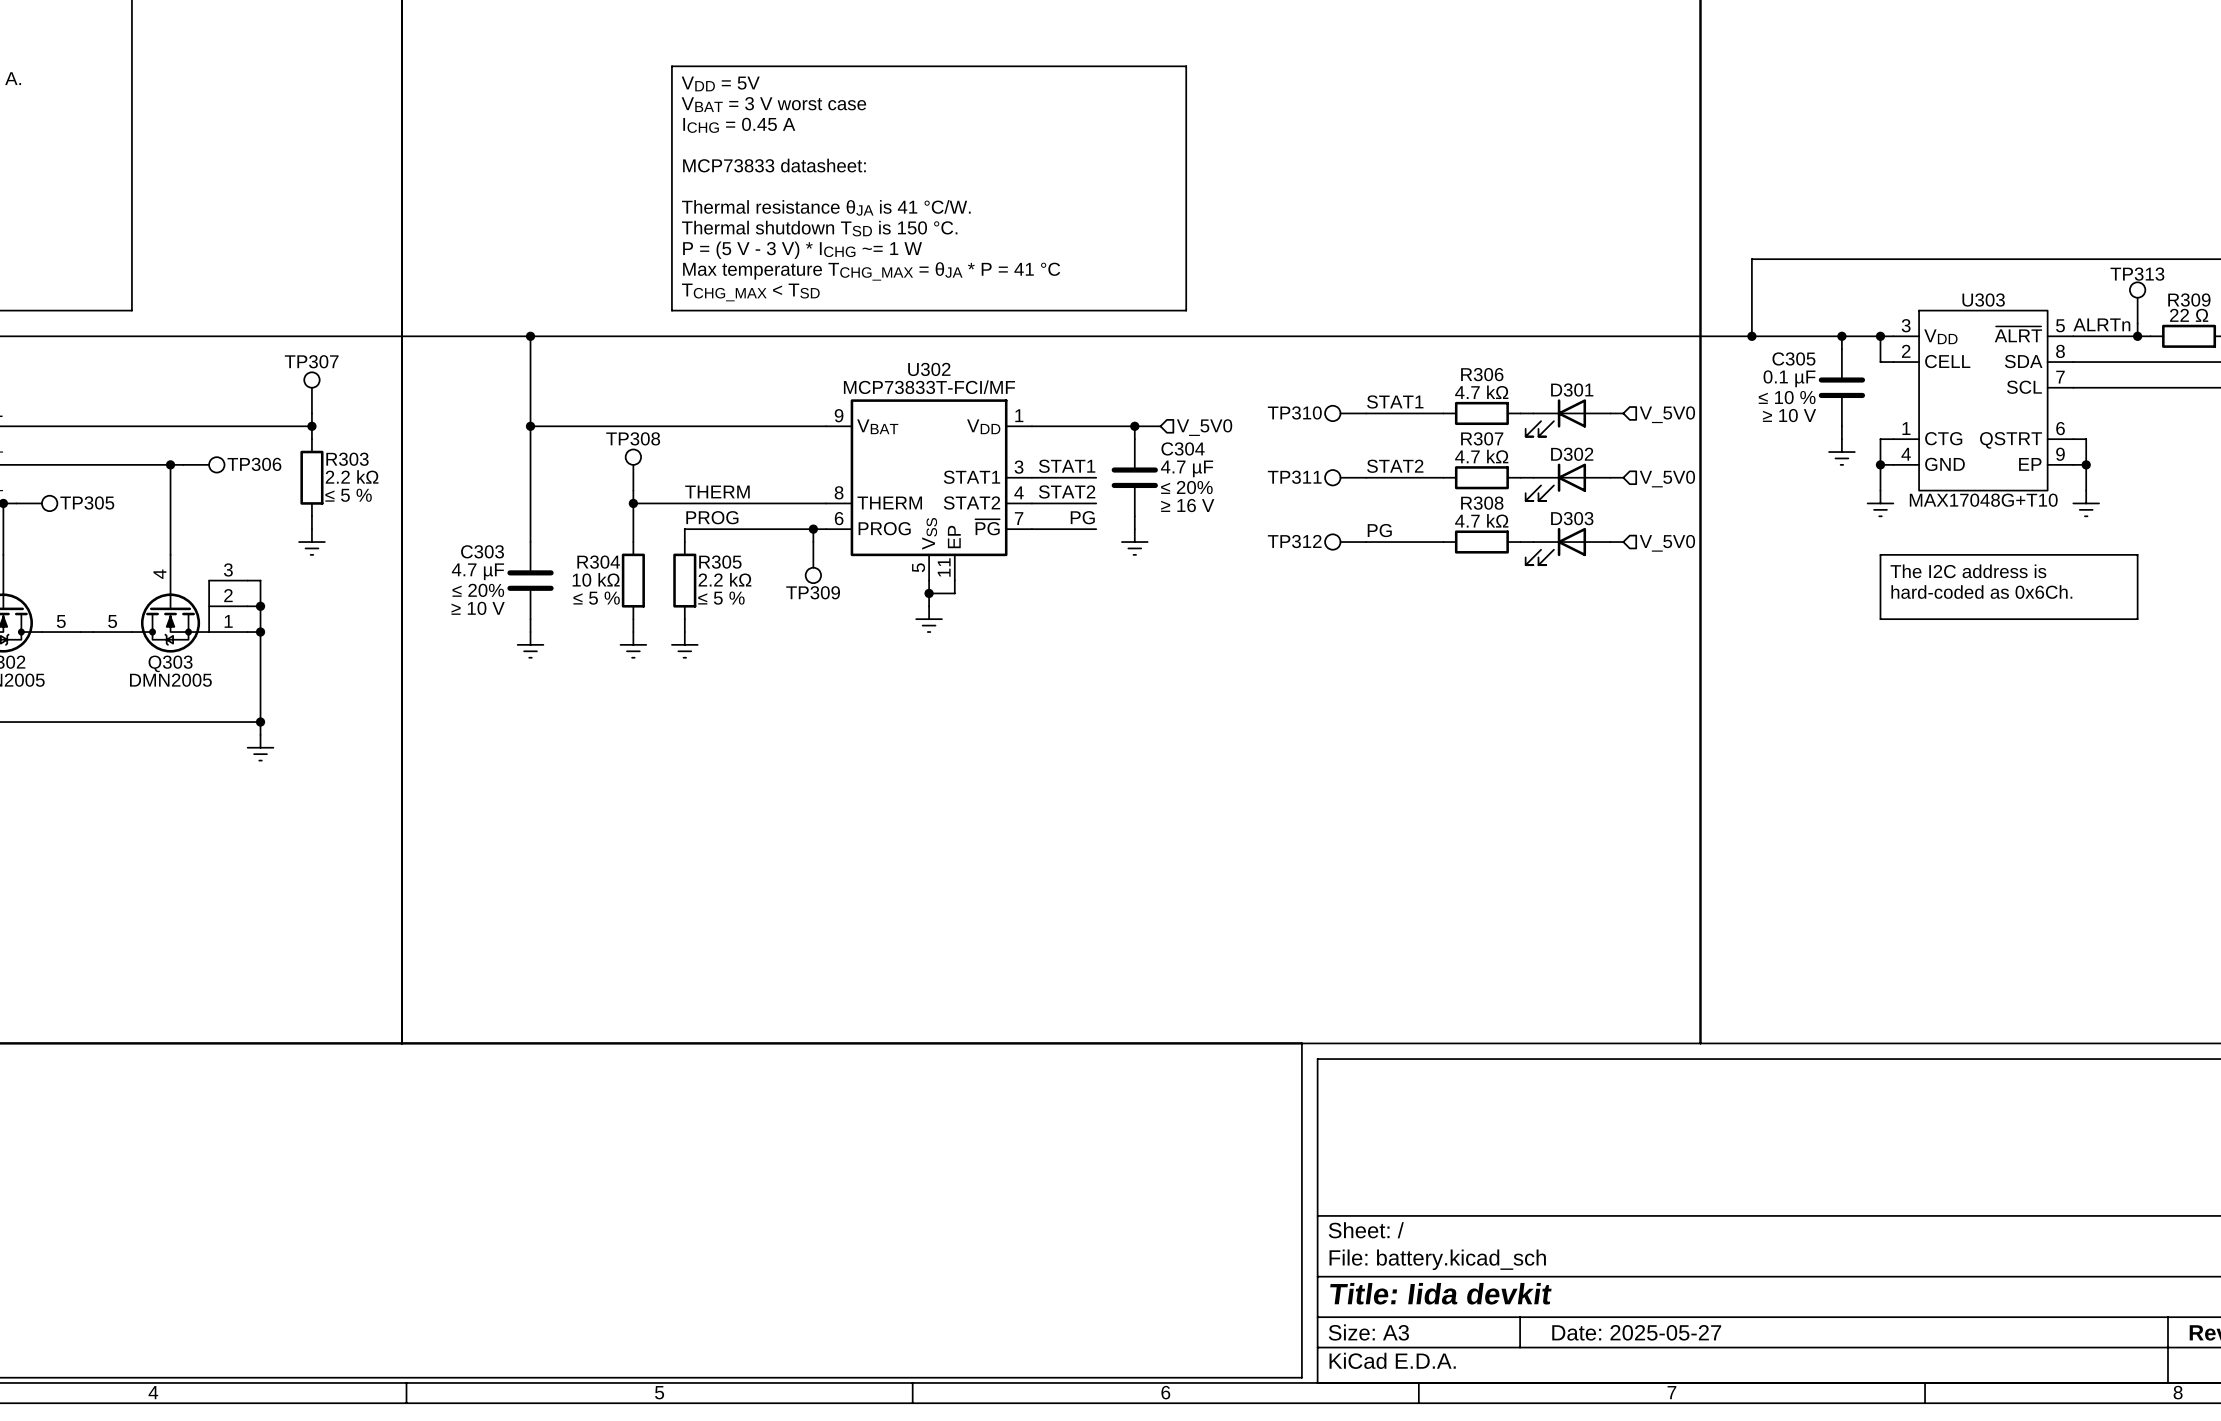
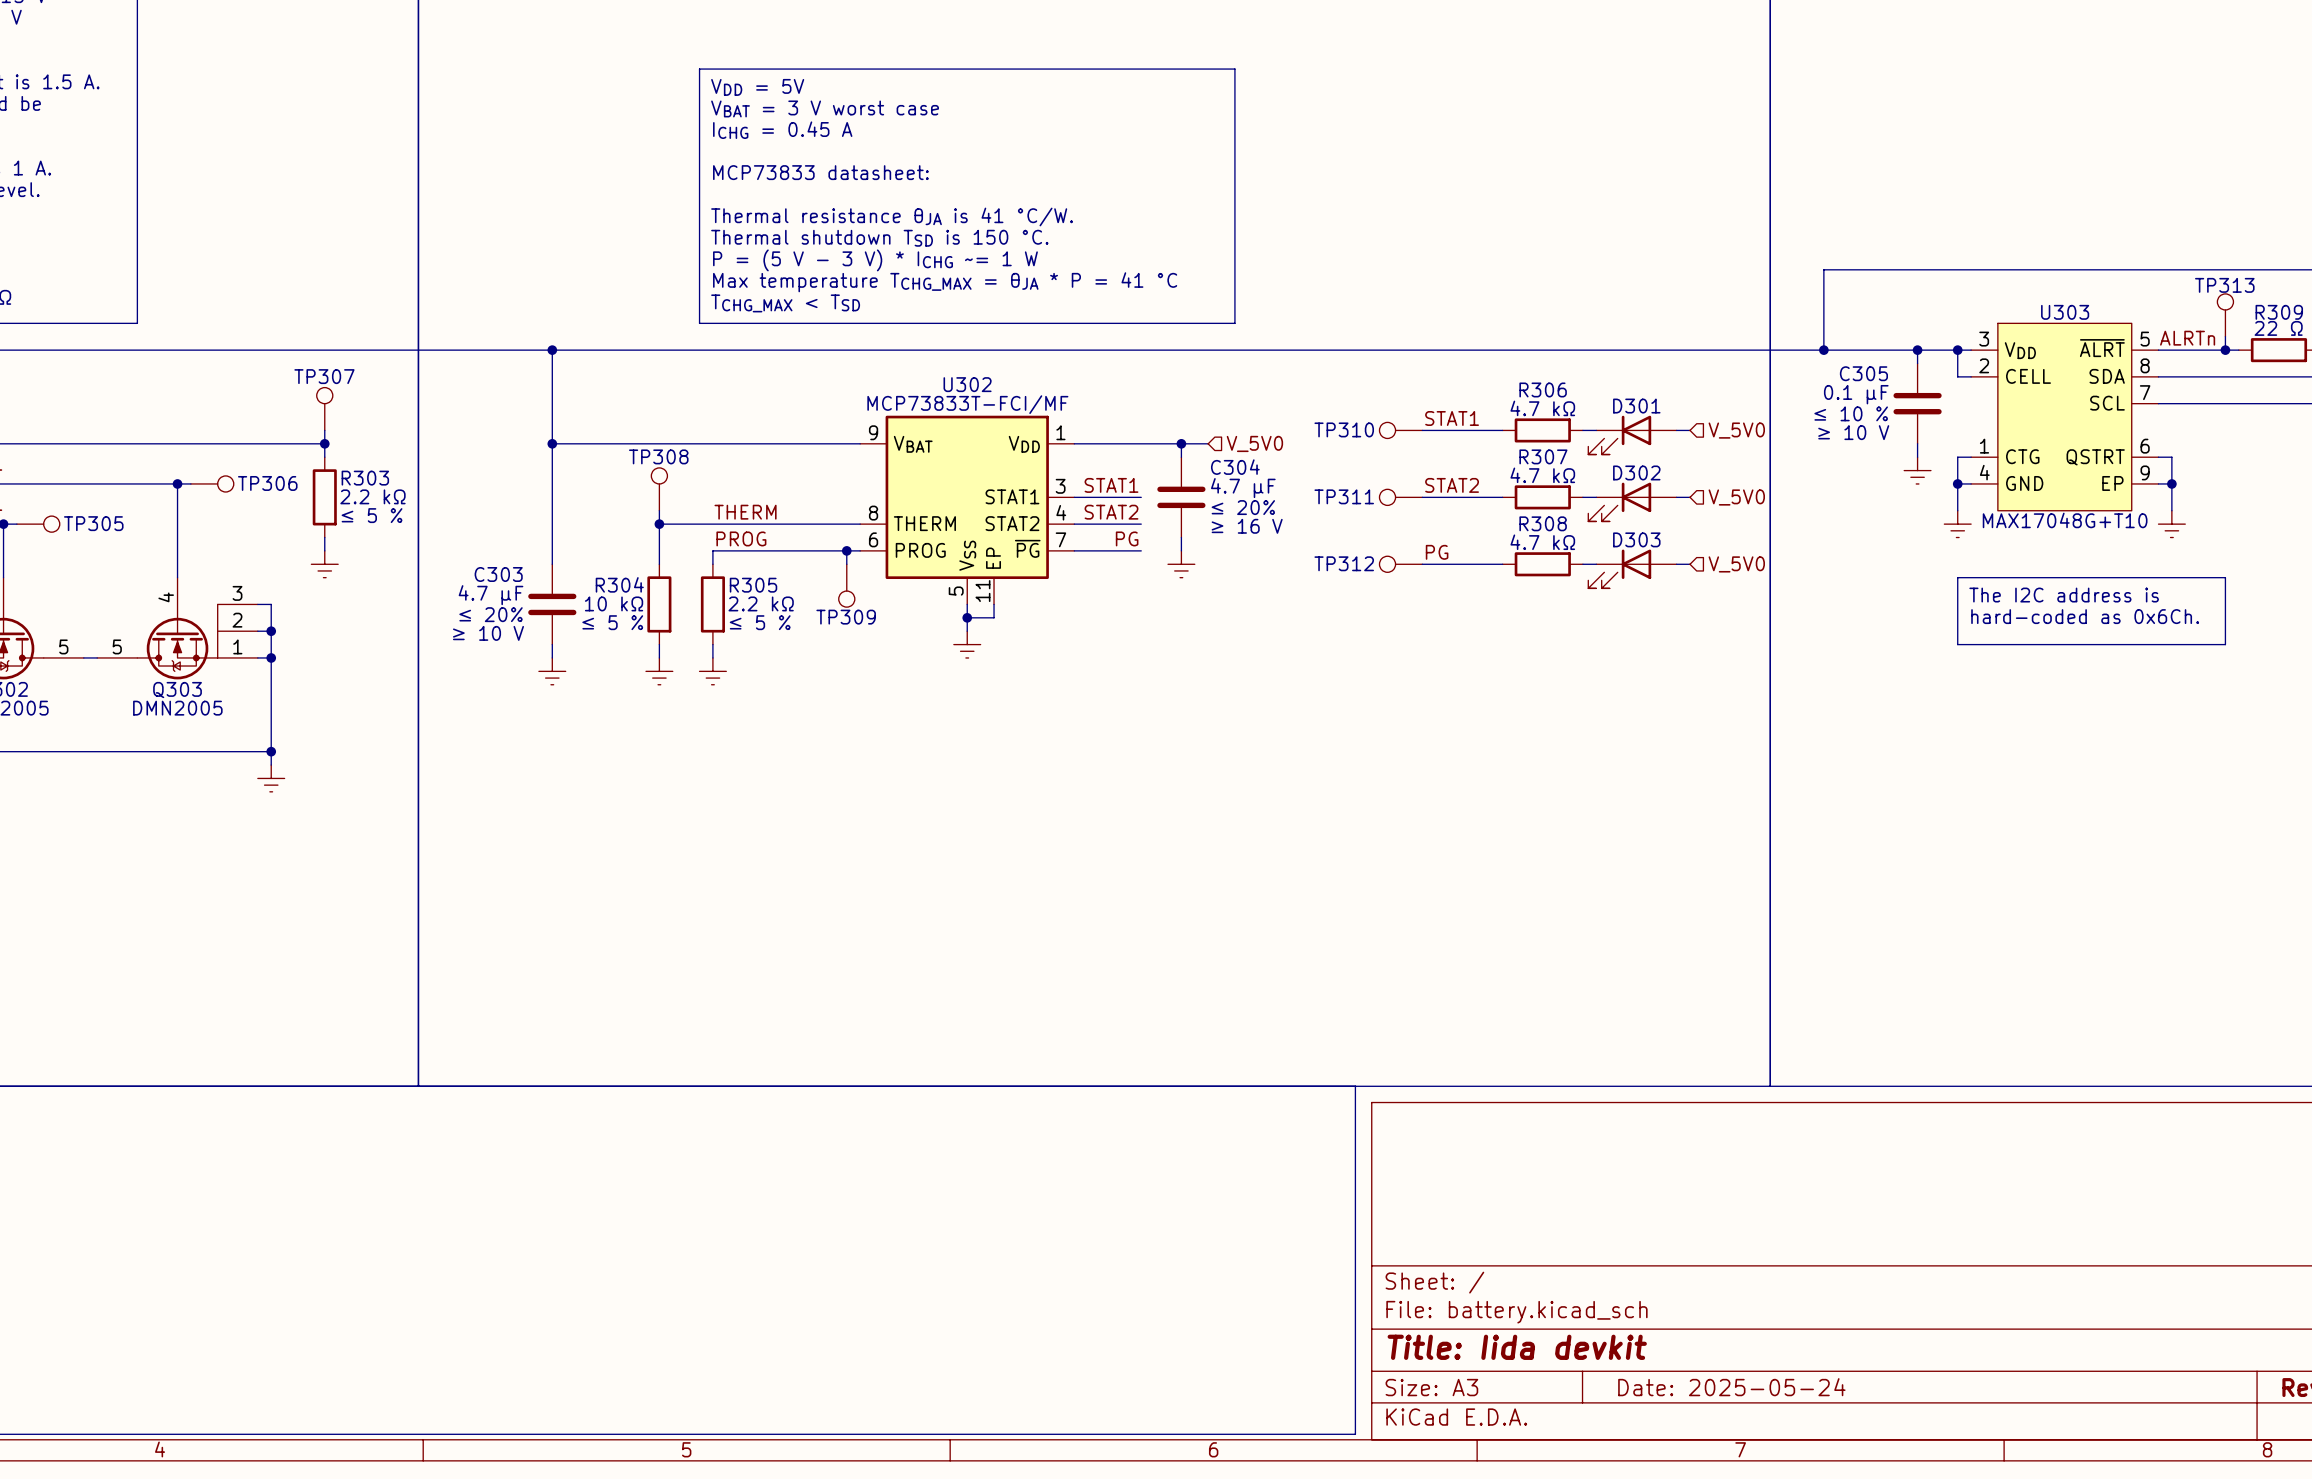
title block: Date: 2025-05-27 (1636, 1332) -> Date: 2025-05-24 (1731, 1387)

